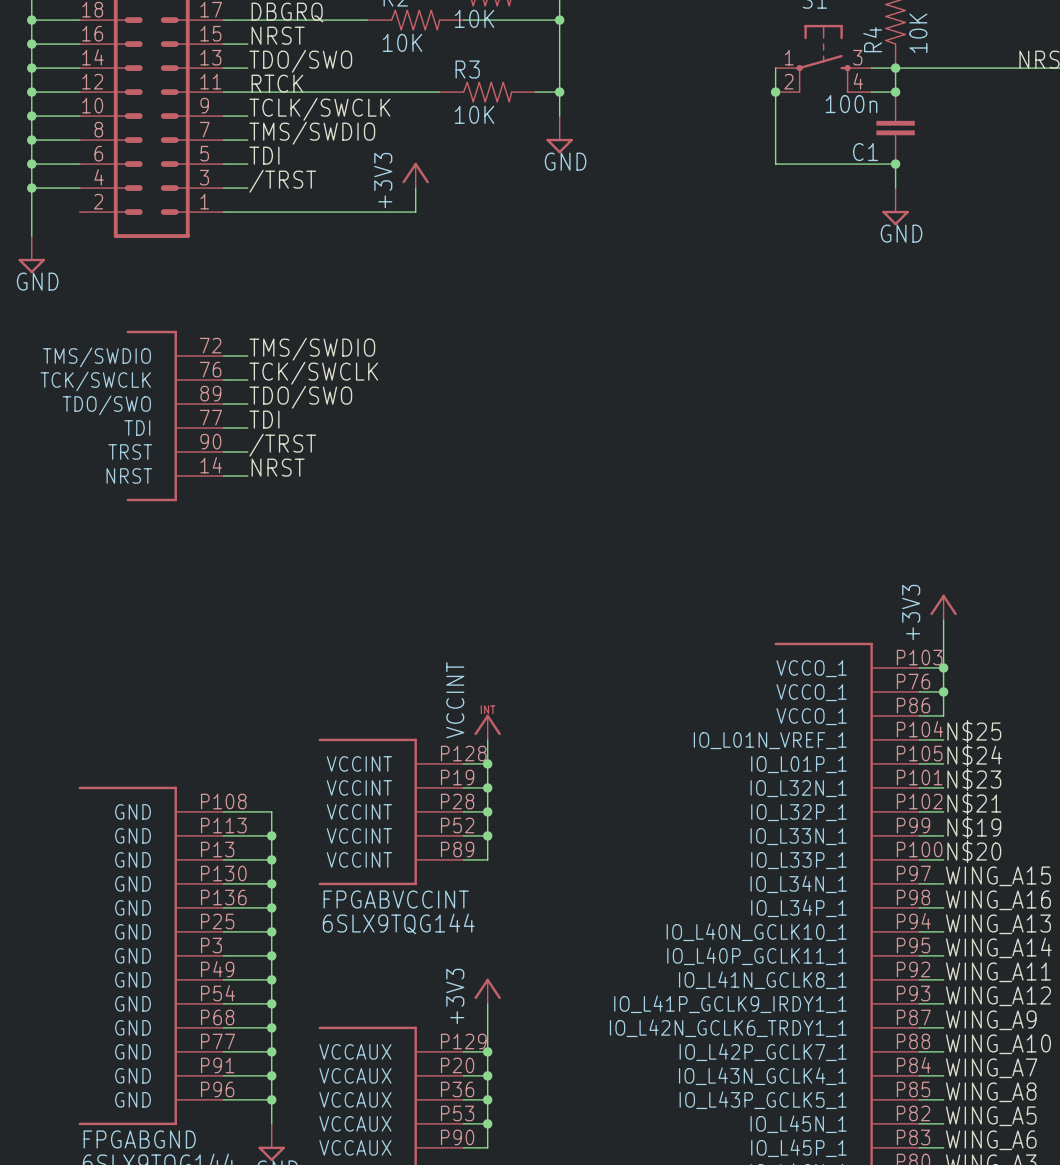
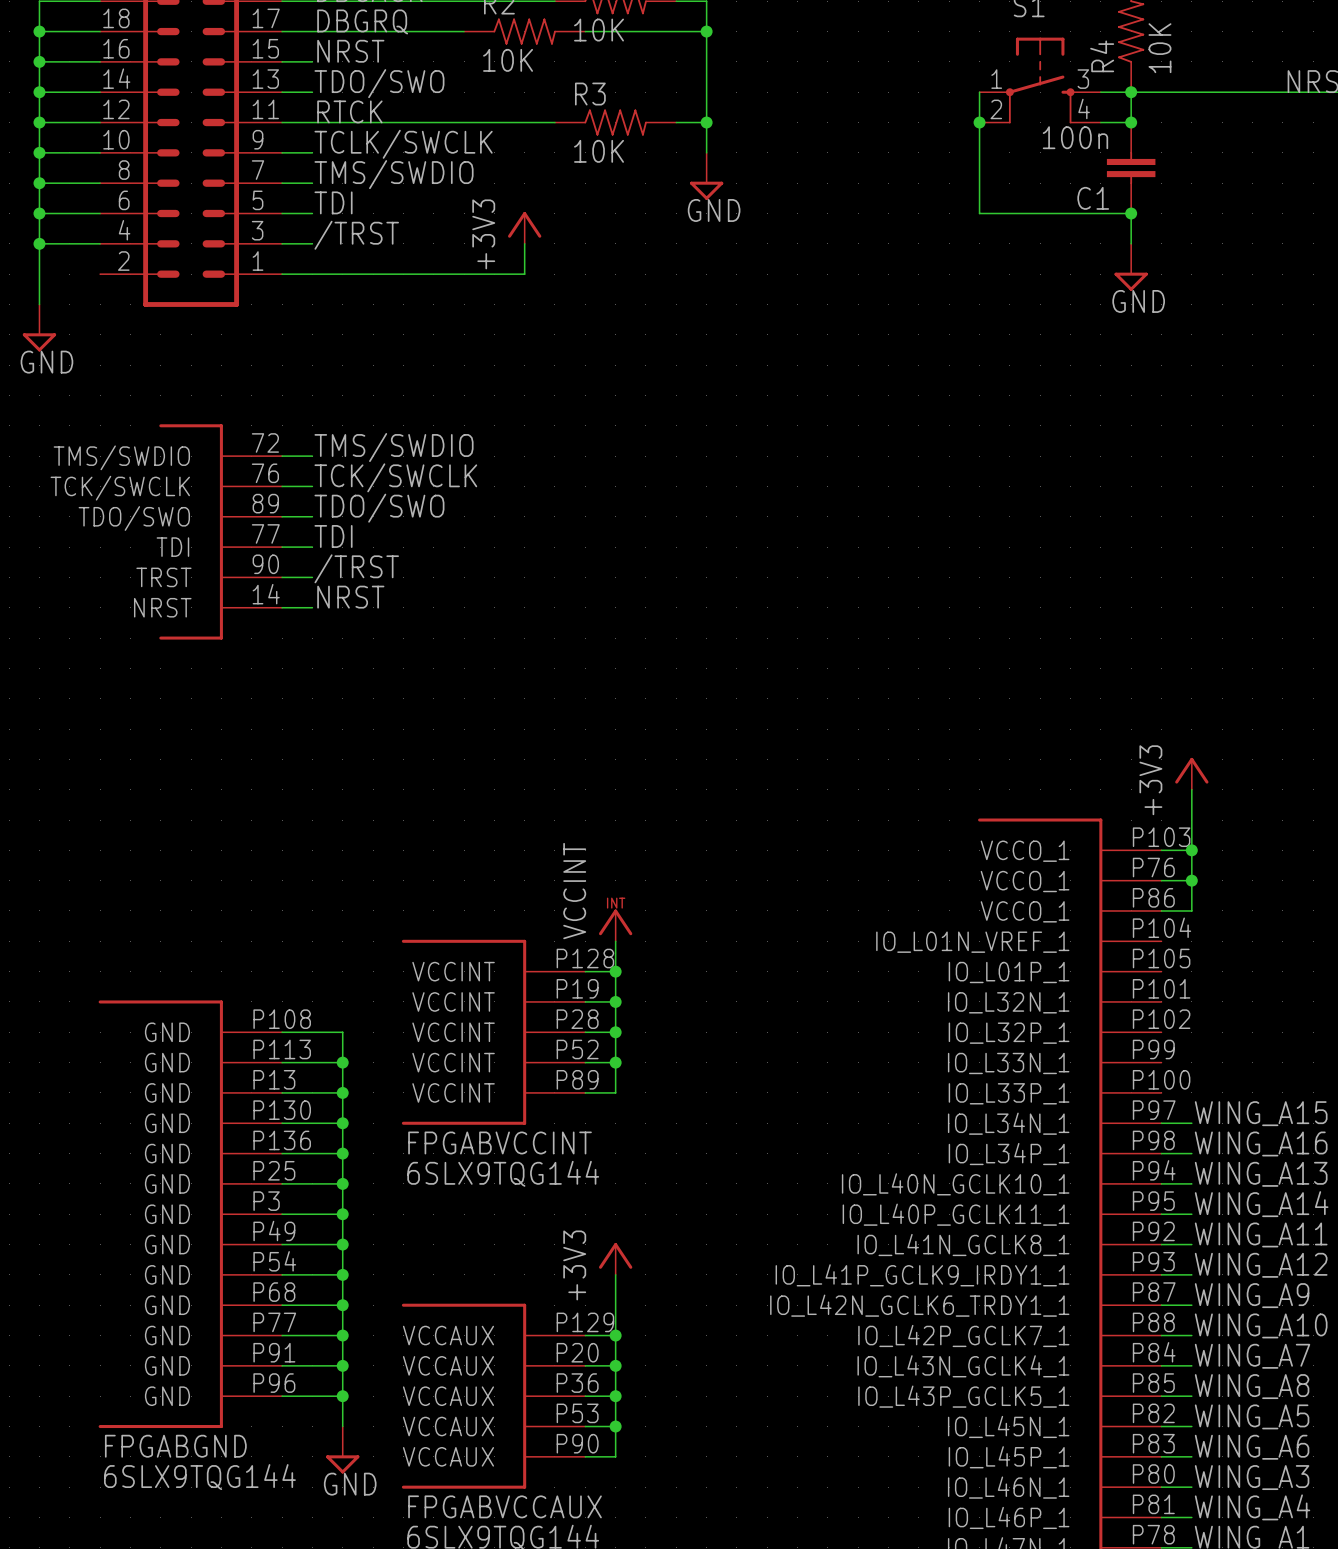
label: N$25 (974, 731) -> none
wire: (919, 739) (943, 739) -> none
label: N$24 (974, 755) -> none
wire: (919, 763) (943, 763) -> none
label: N$23 (974, 779) -> none
wire: (919, 787) (943, 787) -> none
label: N$21 (974, 803) -> none
wire: (919, 811) (943, 811) -> none
label: N$19 (974, 827) -> none
wire: (919, 835) (943, 835) -> none
label: N$20 (974, 851) -> none
wire: (919, 859) (943, 859) -> none

